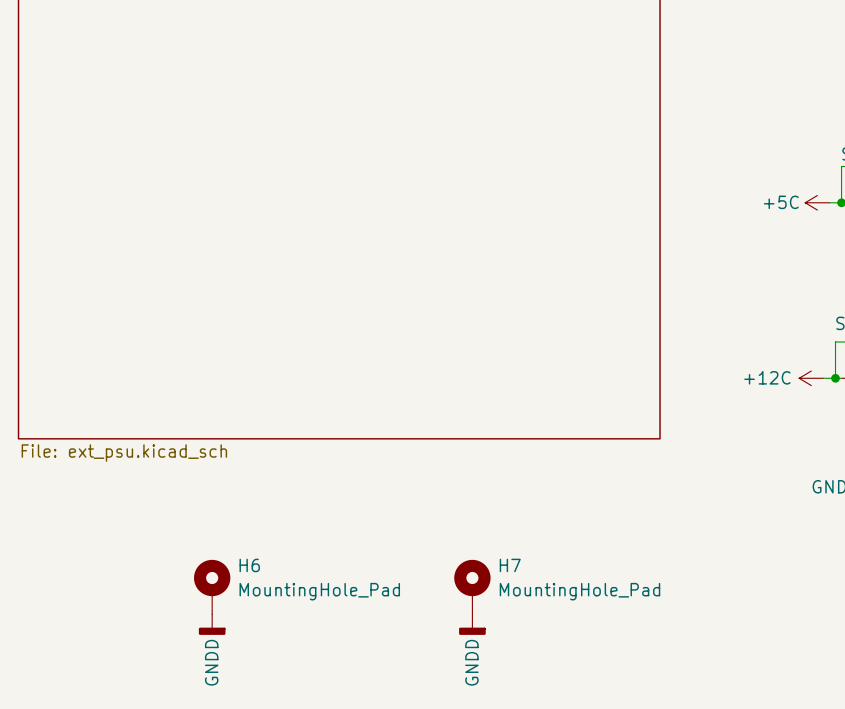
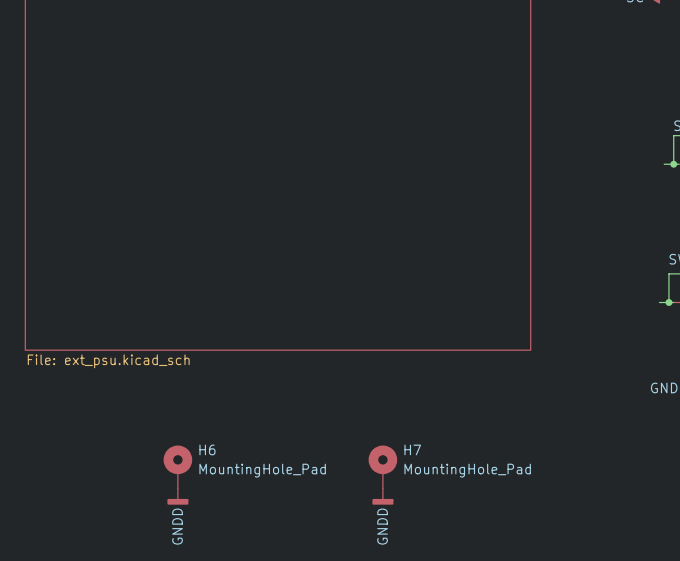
power symbol: +5C (817, 202) -> none
power symbol: +12C (811, 378) -> none

